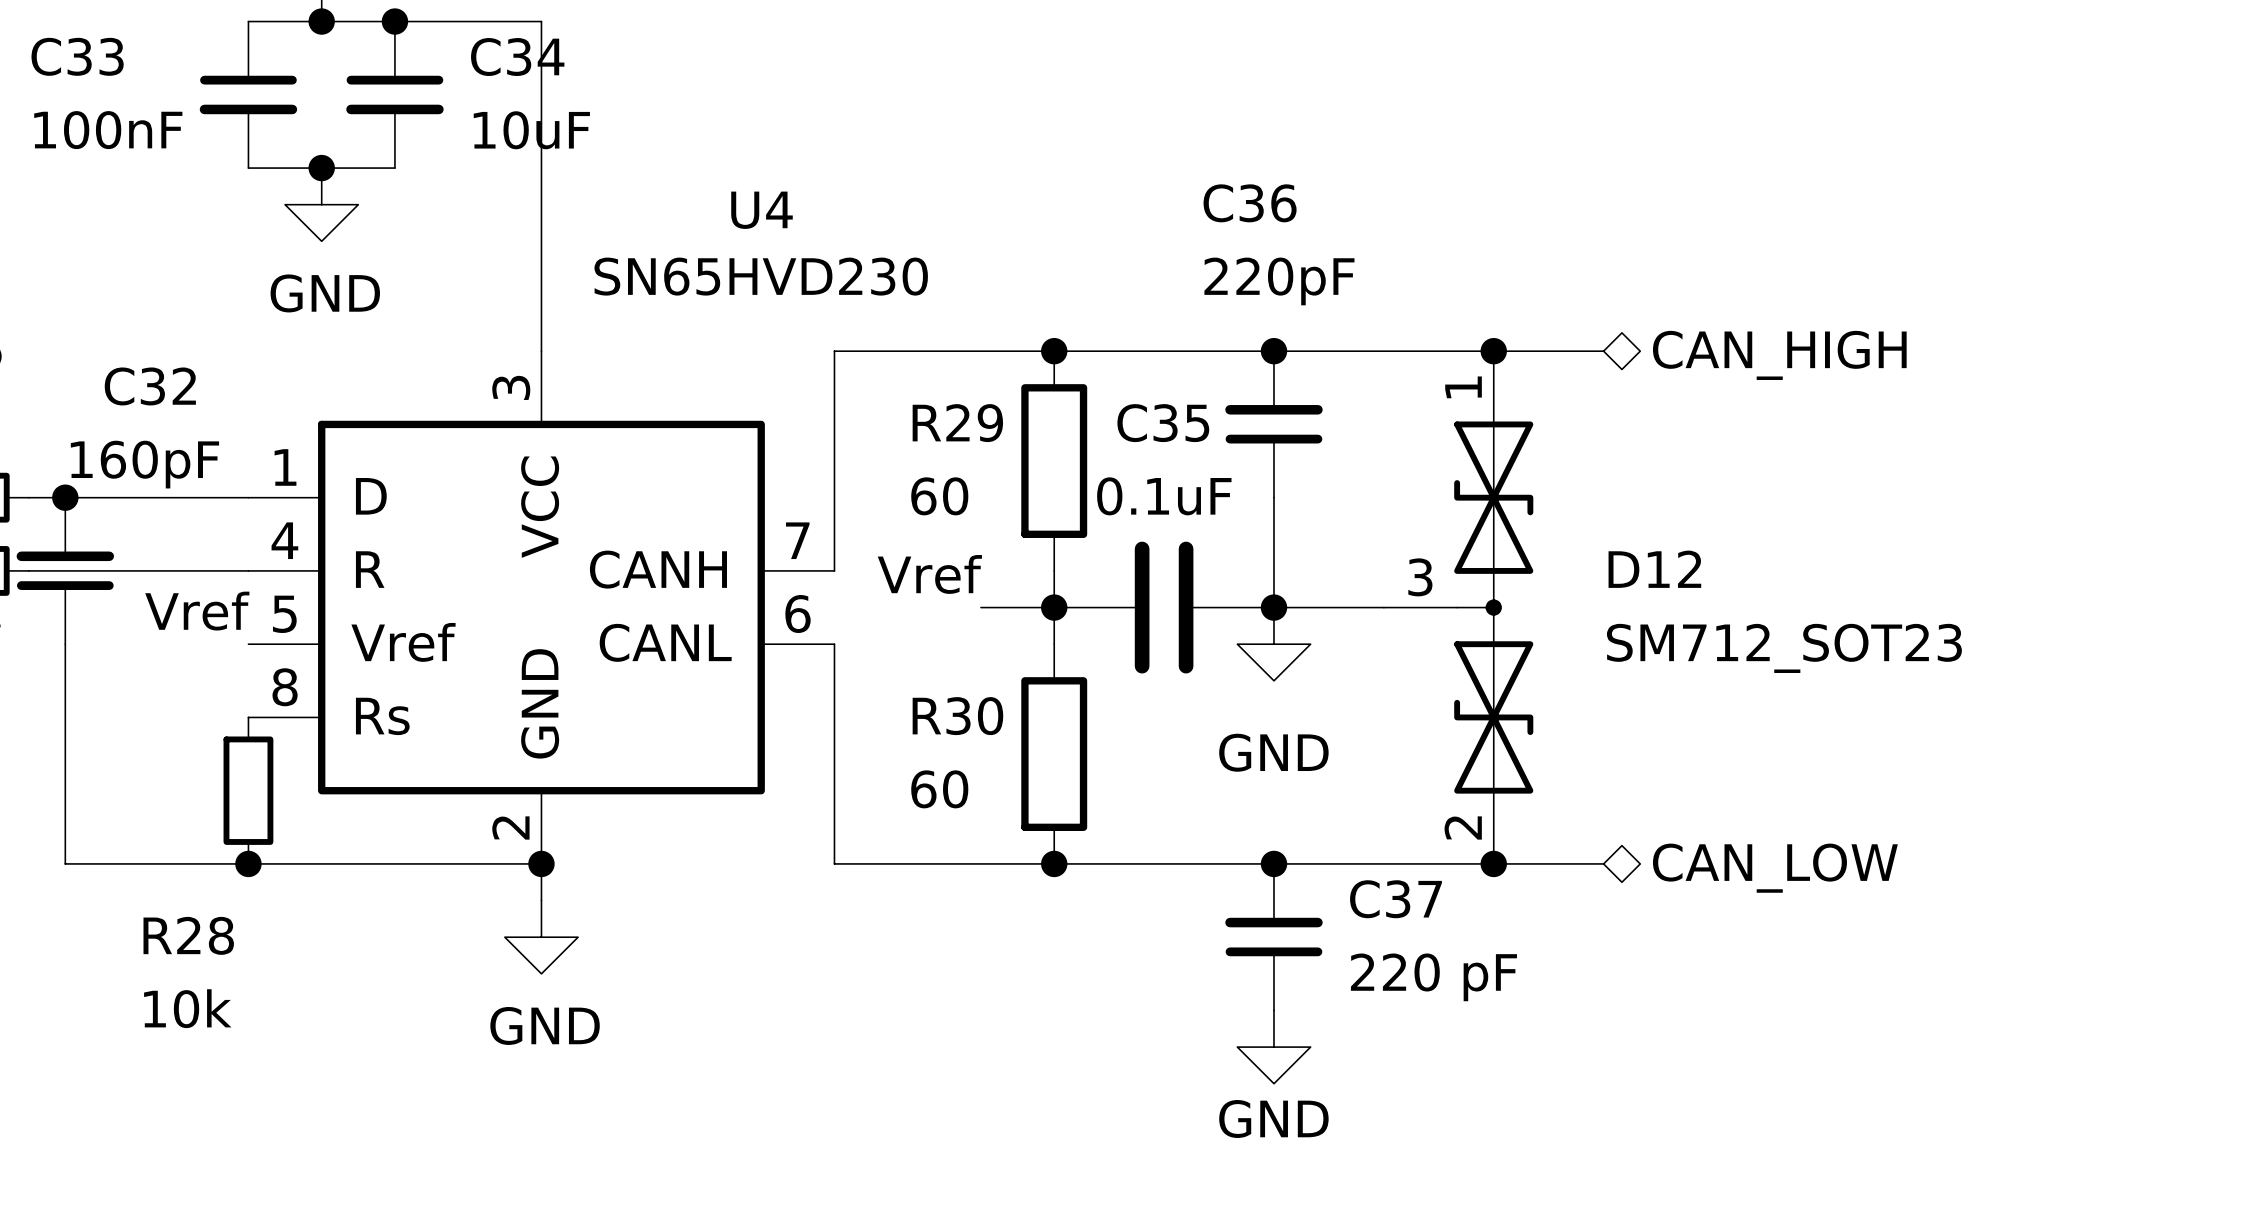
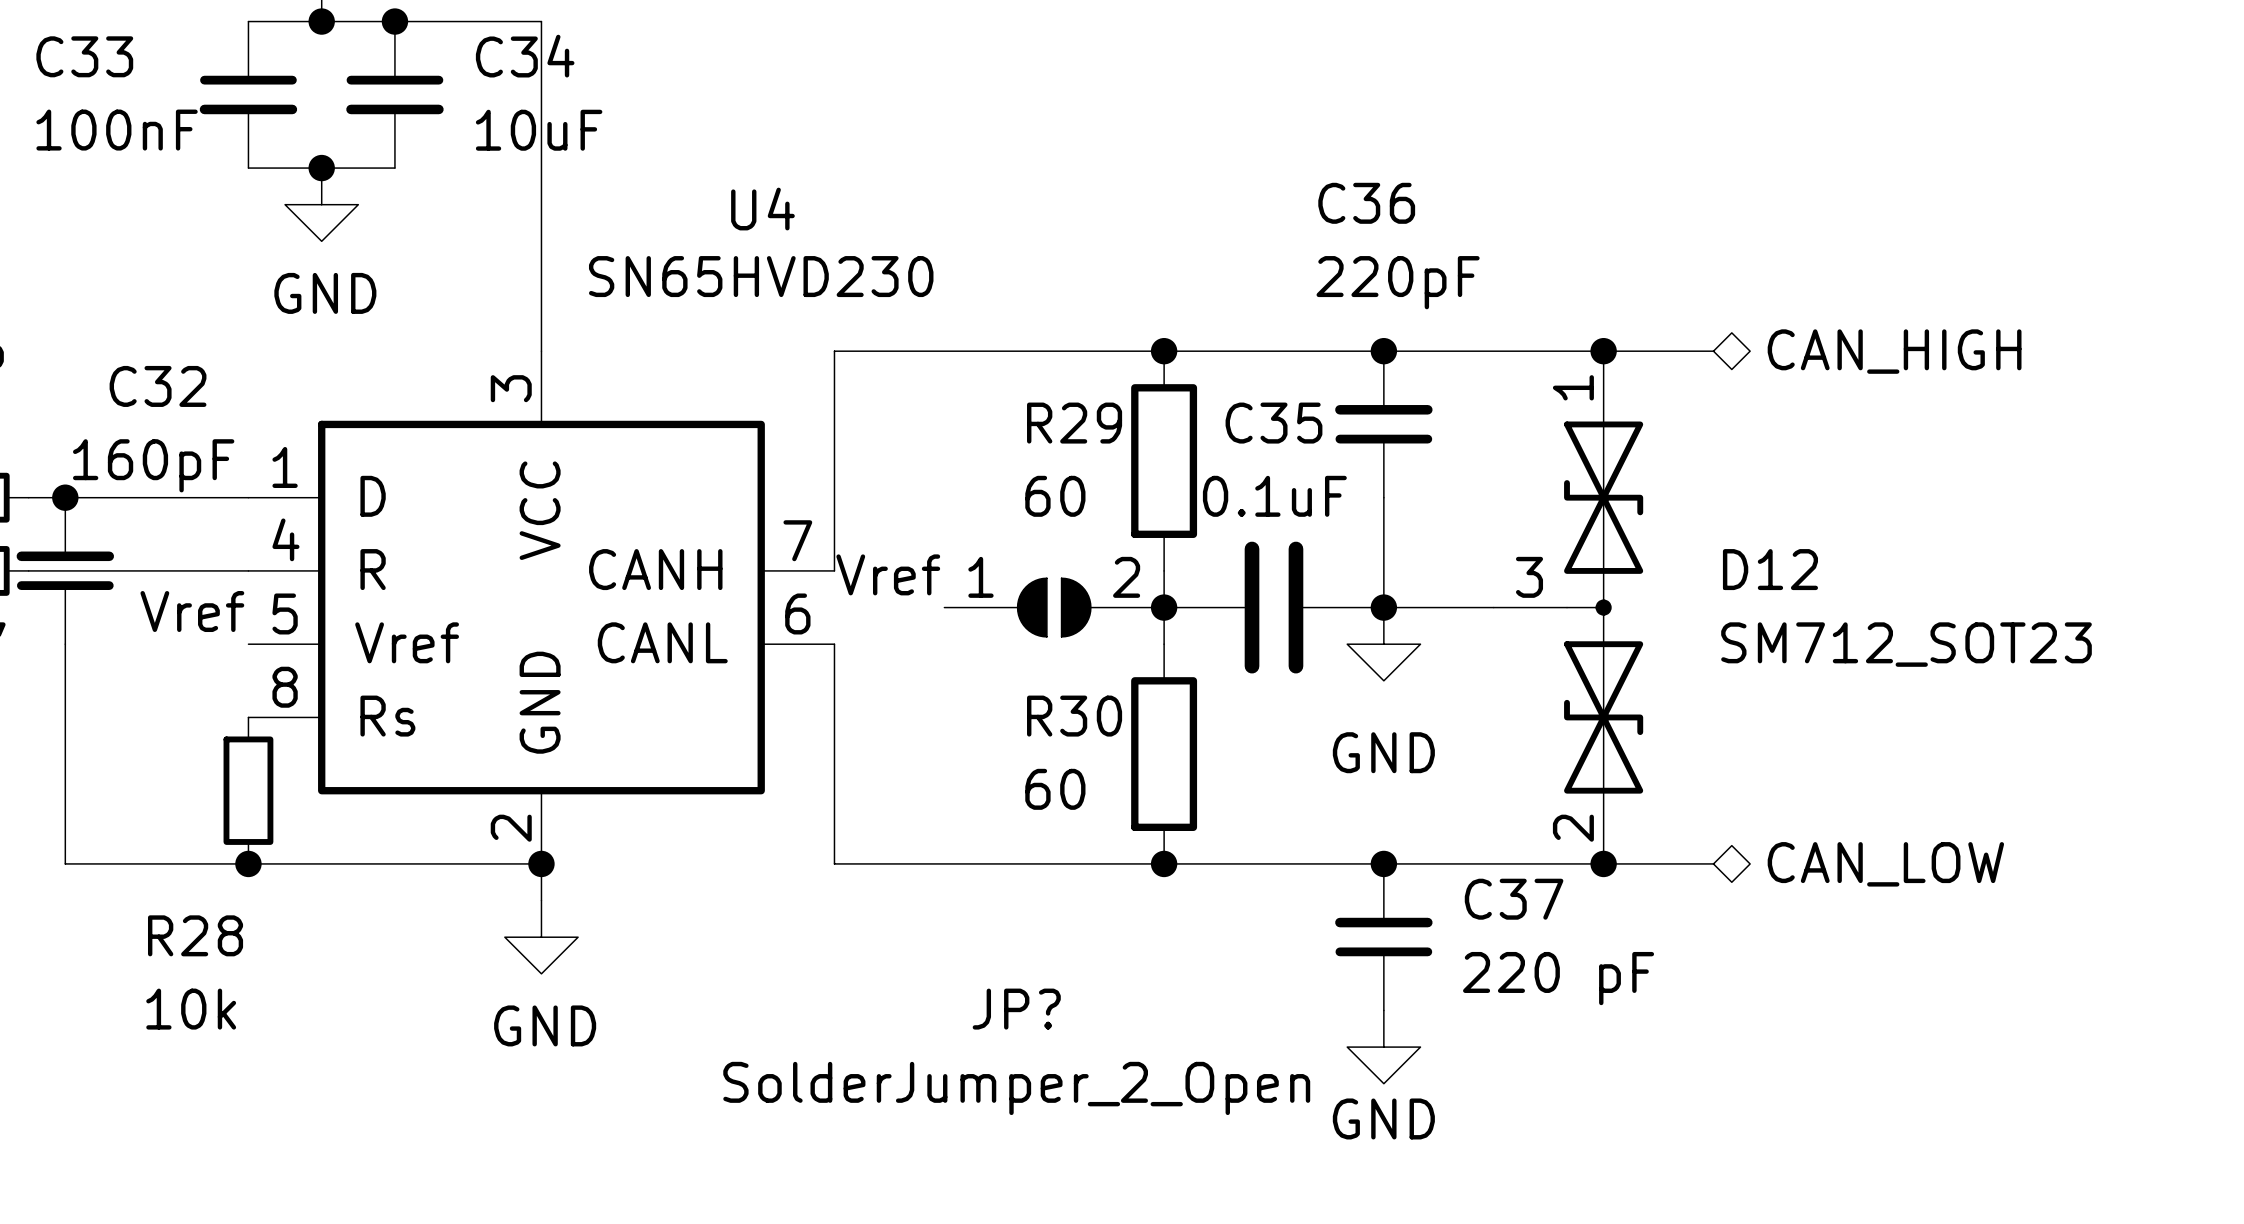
junction: (1054, 351) -> none
junction: none -> (1164, 351)
junction: (1273, 351) -> none
junction: none -> (1383, 351)
junction: (1493, 351) -> none
wire: none -> (1603, 351) (1713, 351)
junction: none -> (1603, 351)
hierarchical label position: CAN_HIGH (1779, 355) -> CAN_HIGH (1894, 351)
C36 position: (1273, 424) -> (1383, 424)
R29 position: (1054, 461) -> (1164, 461)
wire: (1273, 497) (1273, 607) (1383, 607) -> (1383, 497) (1383, 607) (1493, 607)
wire: (1054, 570) (1054, 644) -> (1164, 570) (1164, 644)
label position: Vref (929, 574) -> Vref (888, 574)
junction: (1054, 607) -> none
JP?: none -> SolderJumper_2_Open (1054, 607)
junction: none -> (1164, 607)
C35 position: (1164, 607) -> (1273, 607)
junction: (1273, 607) -> none
junction: none -> (1383, 607)
D12 position: (1458, 607) -> (1568, 607)
power symbol position: GND (1273, 644) -> GND (1383, 644)
R30 position: (1054, 754) -> (1164, 754)
junction: (1054, 863) -> none
junction: none -> (1164, 863)
junction: (1273, 863) -> none
junction: none -> (1383, 863)
junction: (1493, 863) -> none
wire: none -> (1603, 863) (1713, 863)
junction: none -> (1603, 863)
hierarchical label position: CAN_LOW (1775, 868) -> CAN_LOW (1885, 864)
C37 position: (1273, 937) -> (1383, 937)
power symbol position: GND (1273, 1047) -> GND (1383, 1047)

